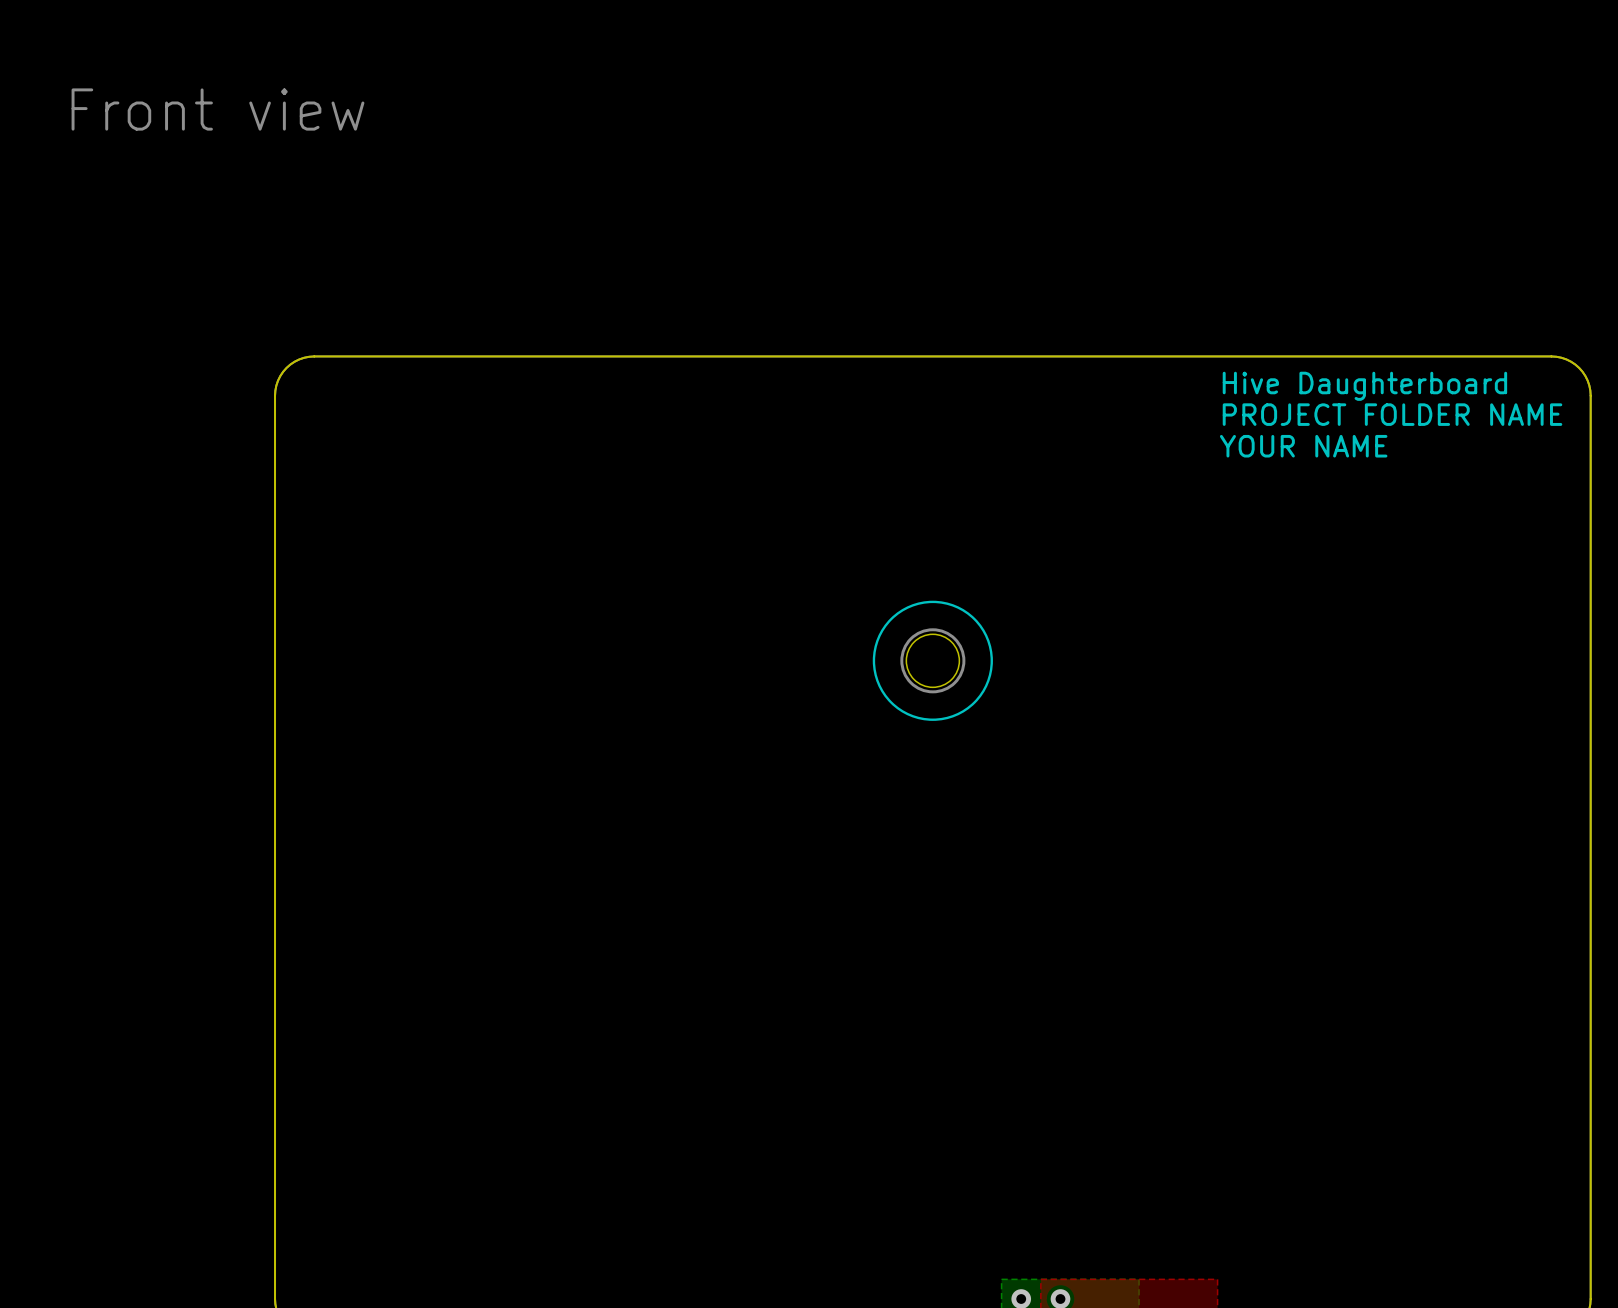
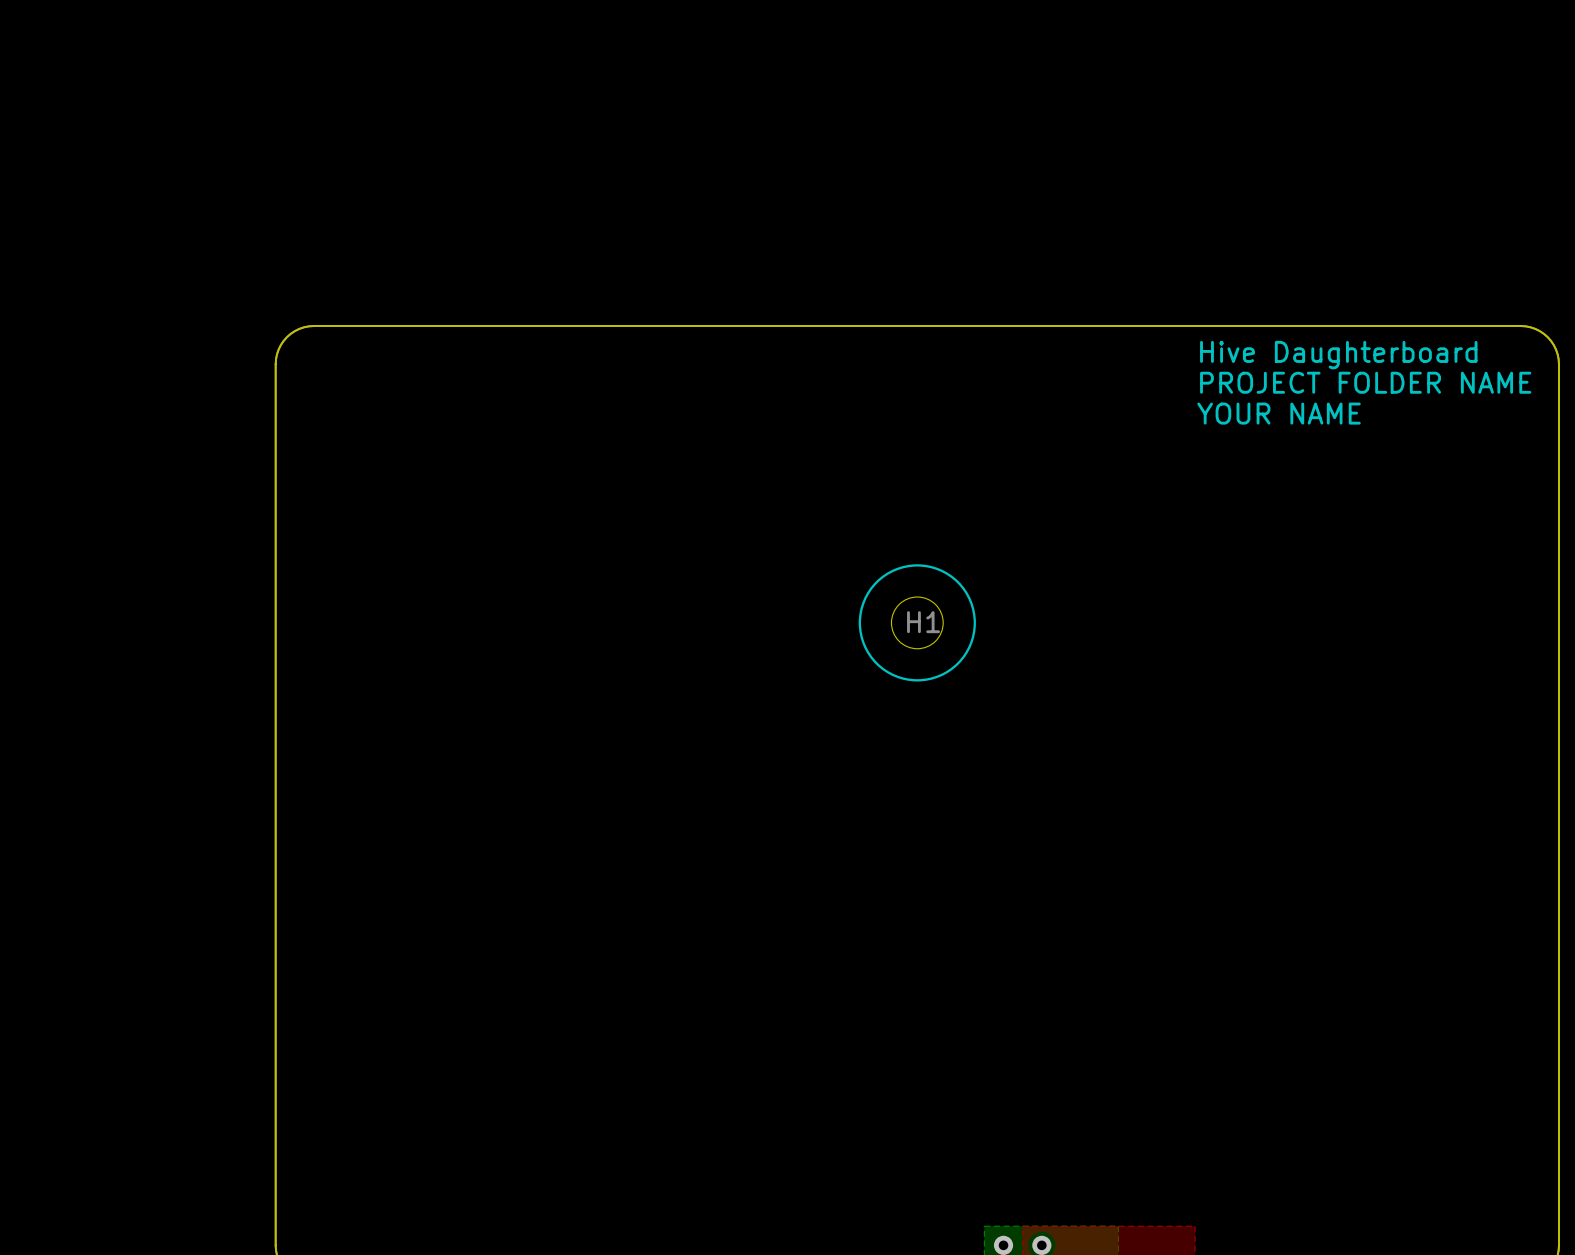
text: Front view (217, 109) -> none
drawing: [900, 628, 966, 694] -> none
H1 name: none -> H1 (923, 622)

